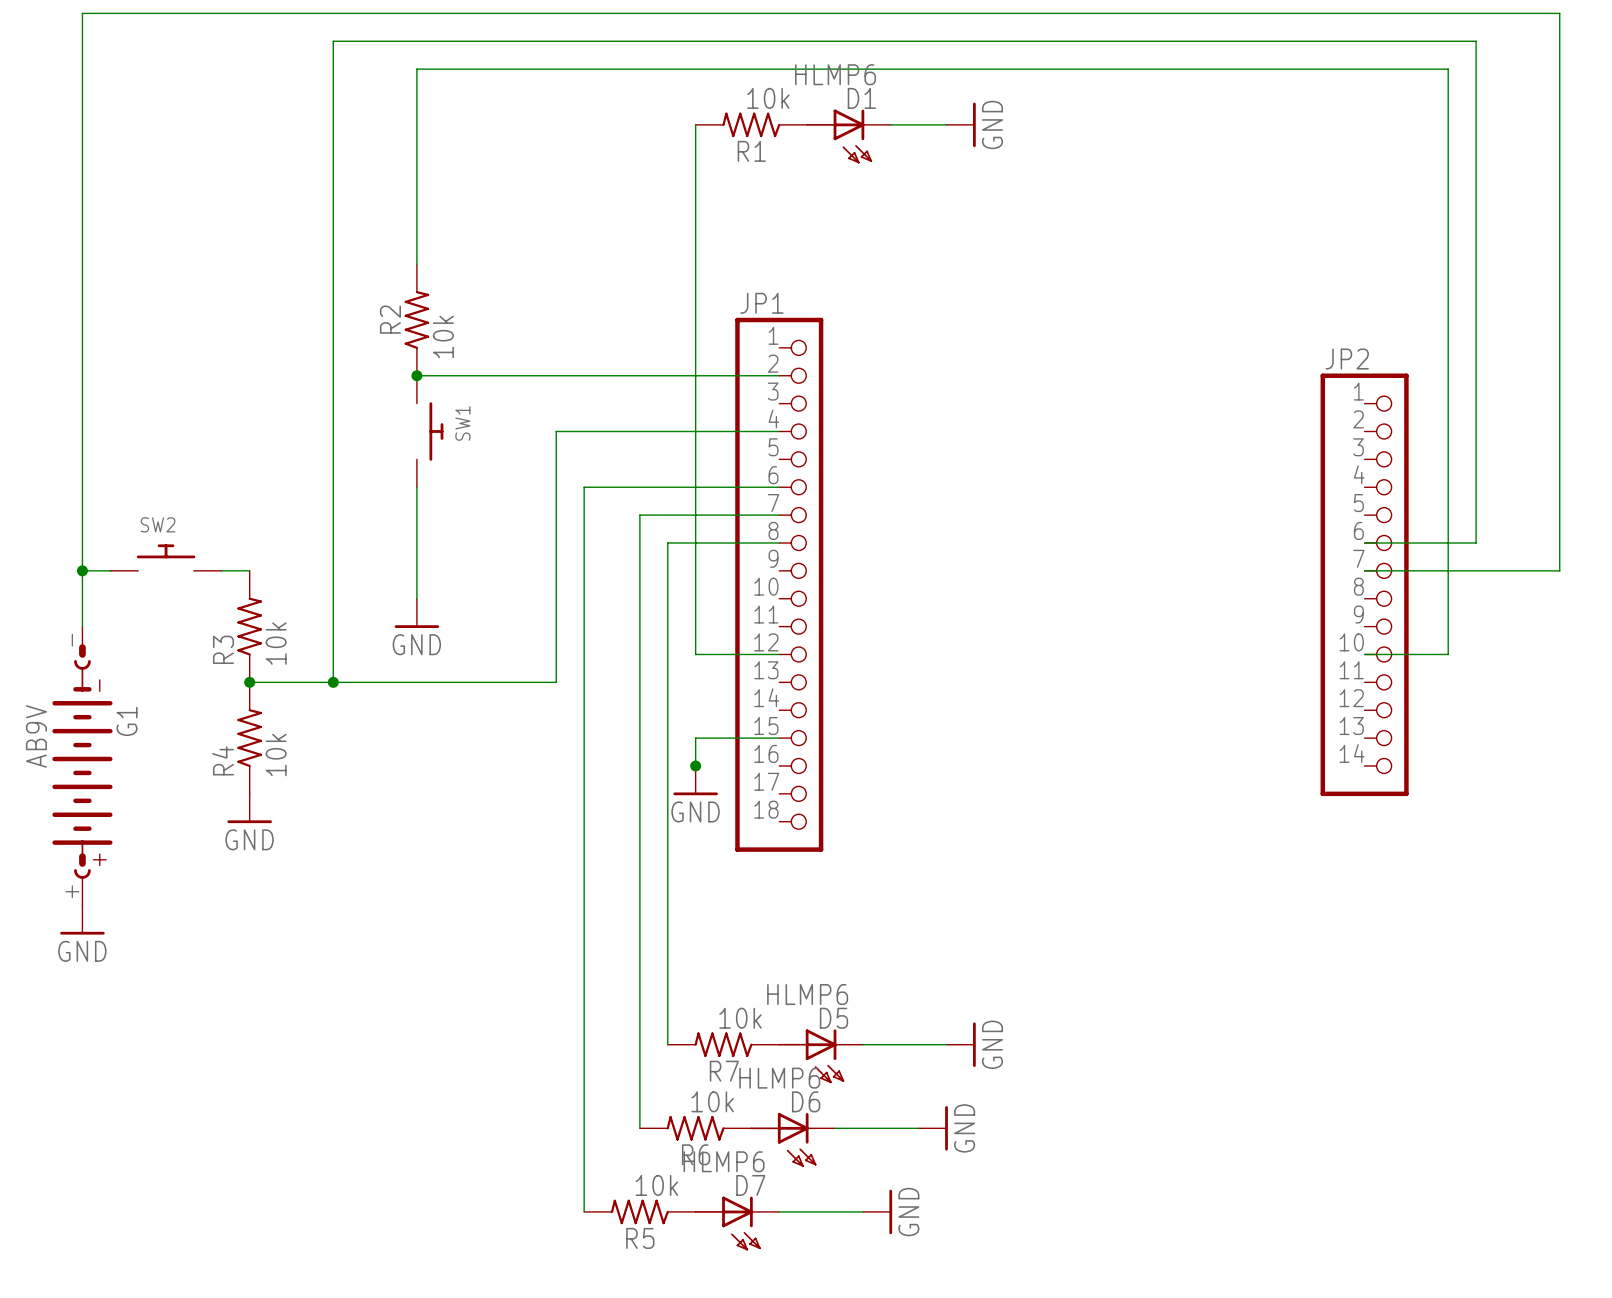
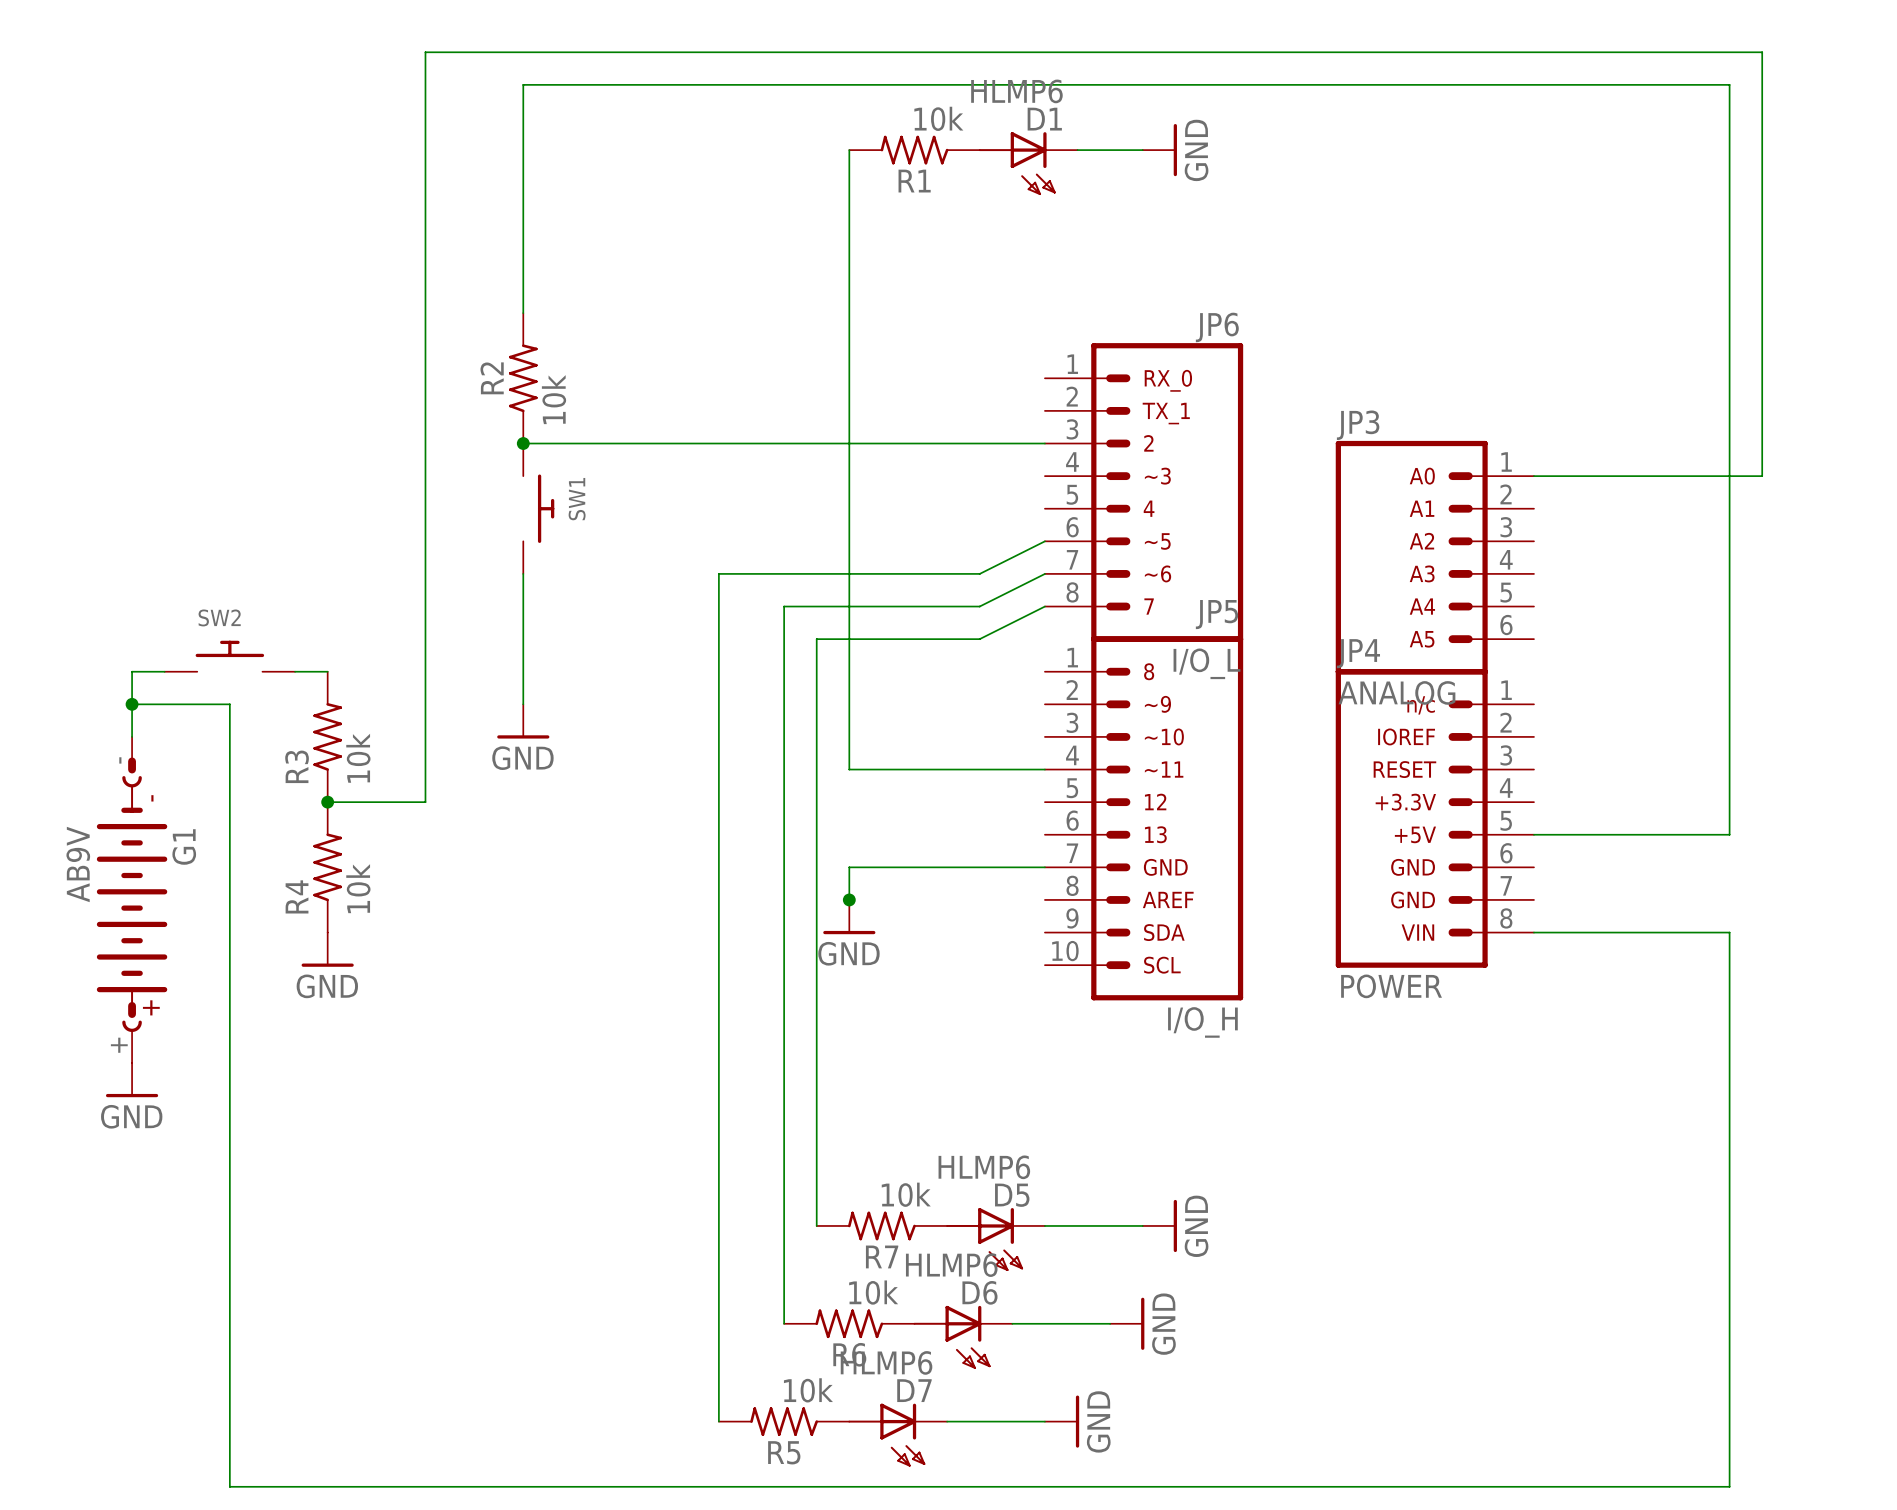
wire: none -> (947, 443) (1044, 443)
wire: (1476, 403) (1476, 542) (1364, 542) -> (1762, 476) (1533, 476)
JP6: none -> (1144, 492)
wire: (779, 431) (556, 431) (556, 682) (333, 682) -> none
wire: none -> (1044, 541) (979, 573) (947, 573)
JP3: none -> (1434, 557)
wire: none -> (1044, 573) (979, 606) (947, 606)
wire: none -> (1044, 606) (979, 639) (947, 639)
wire: (82, 570) (82, 13) (1559, 13) (1559, 570) (1364, 570) -> none
junction position: (82, 570) -> (132, 704)
JP1: (779, 584) -> none
JP2: (1364, 584) -> none
wire: none -> (132, 704) (229, 704) (229, 1486) (1729, 1486) (1729, 932) (1533, 932)
wire: none -> (947, 769) (1044, 769)
wire: (1364, 654) (1448, 654) -> (1533, 834) (1729, 834) (1729, 769)
junction: (333, 682) -> none
JP5: none -> (1144, 818)
JP4: none -> (1434, 818)
wire: none -> (947, 867) (1044, 867)

